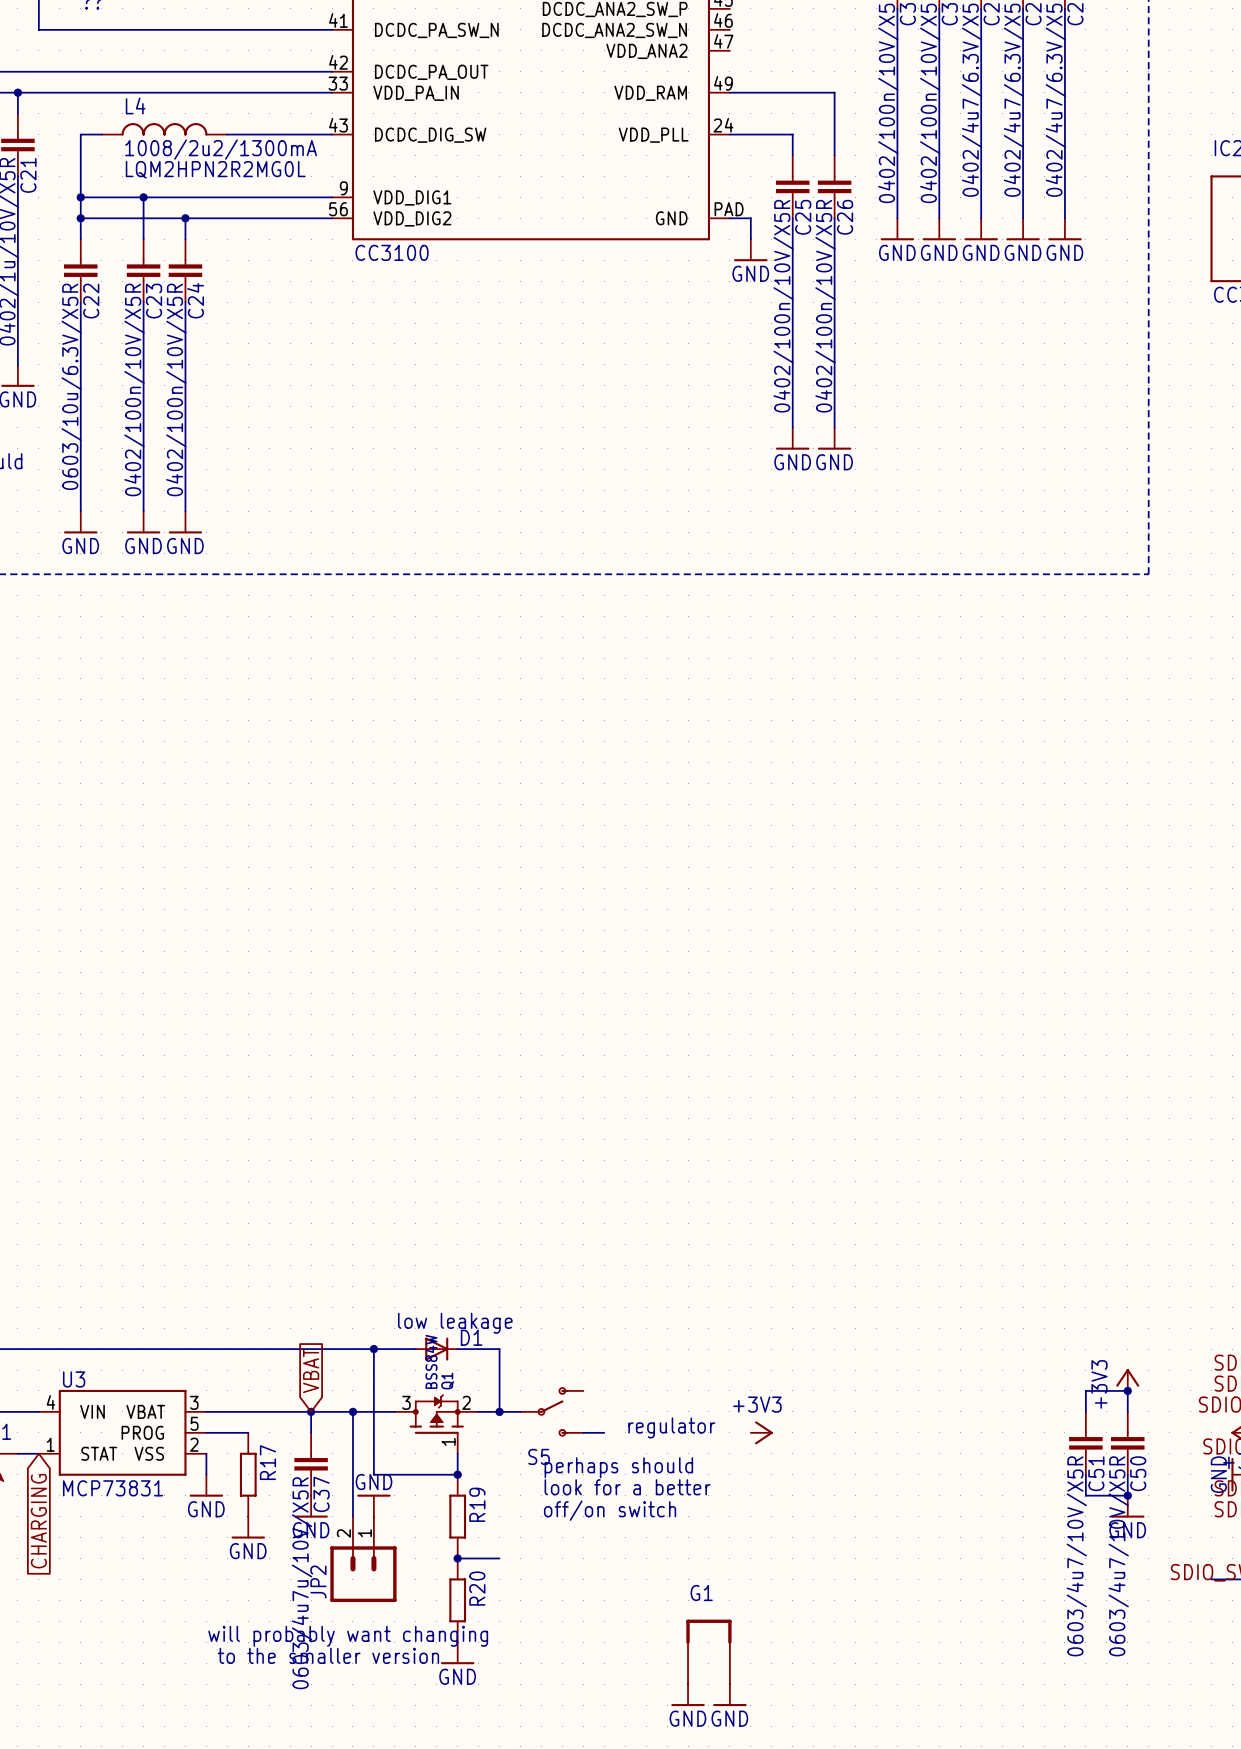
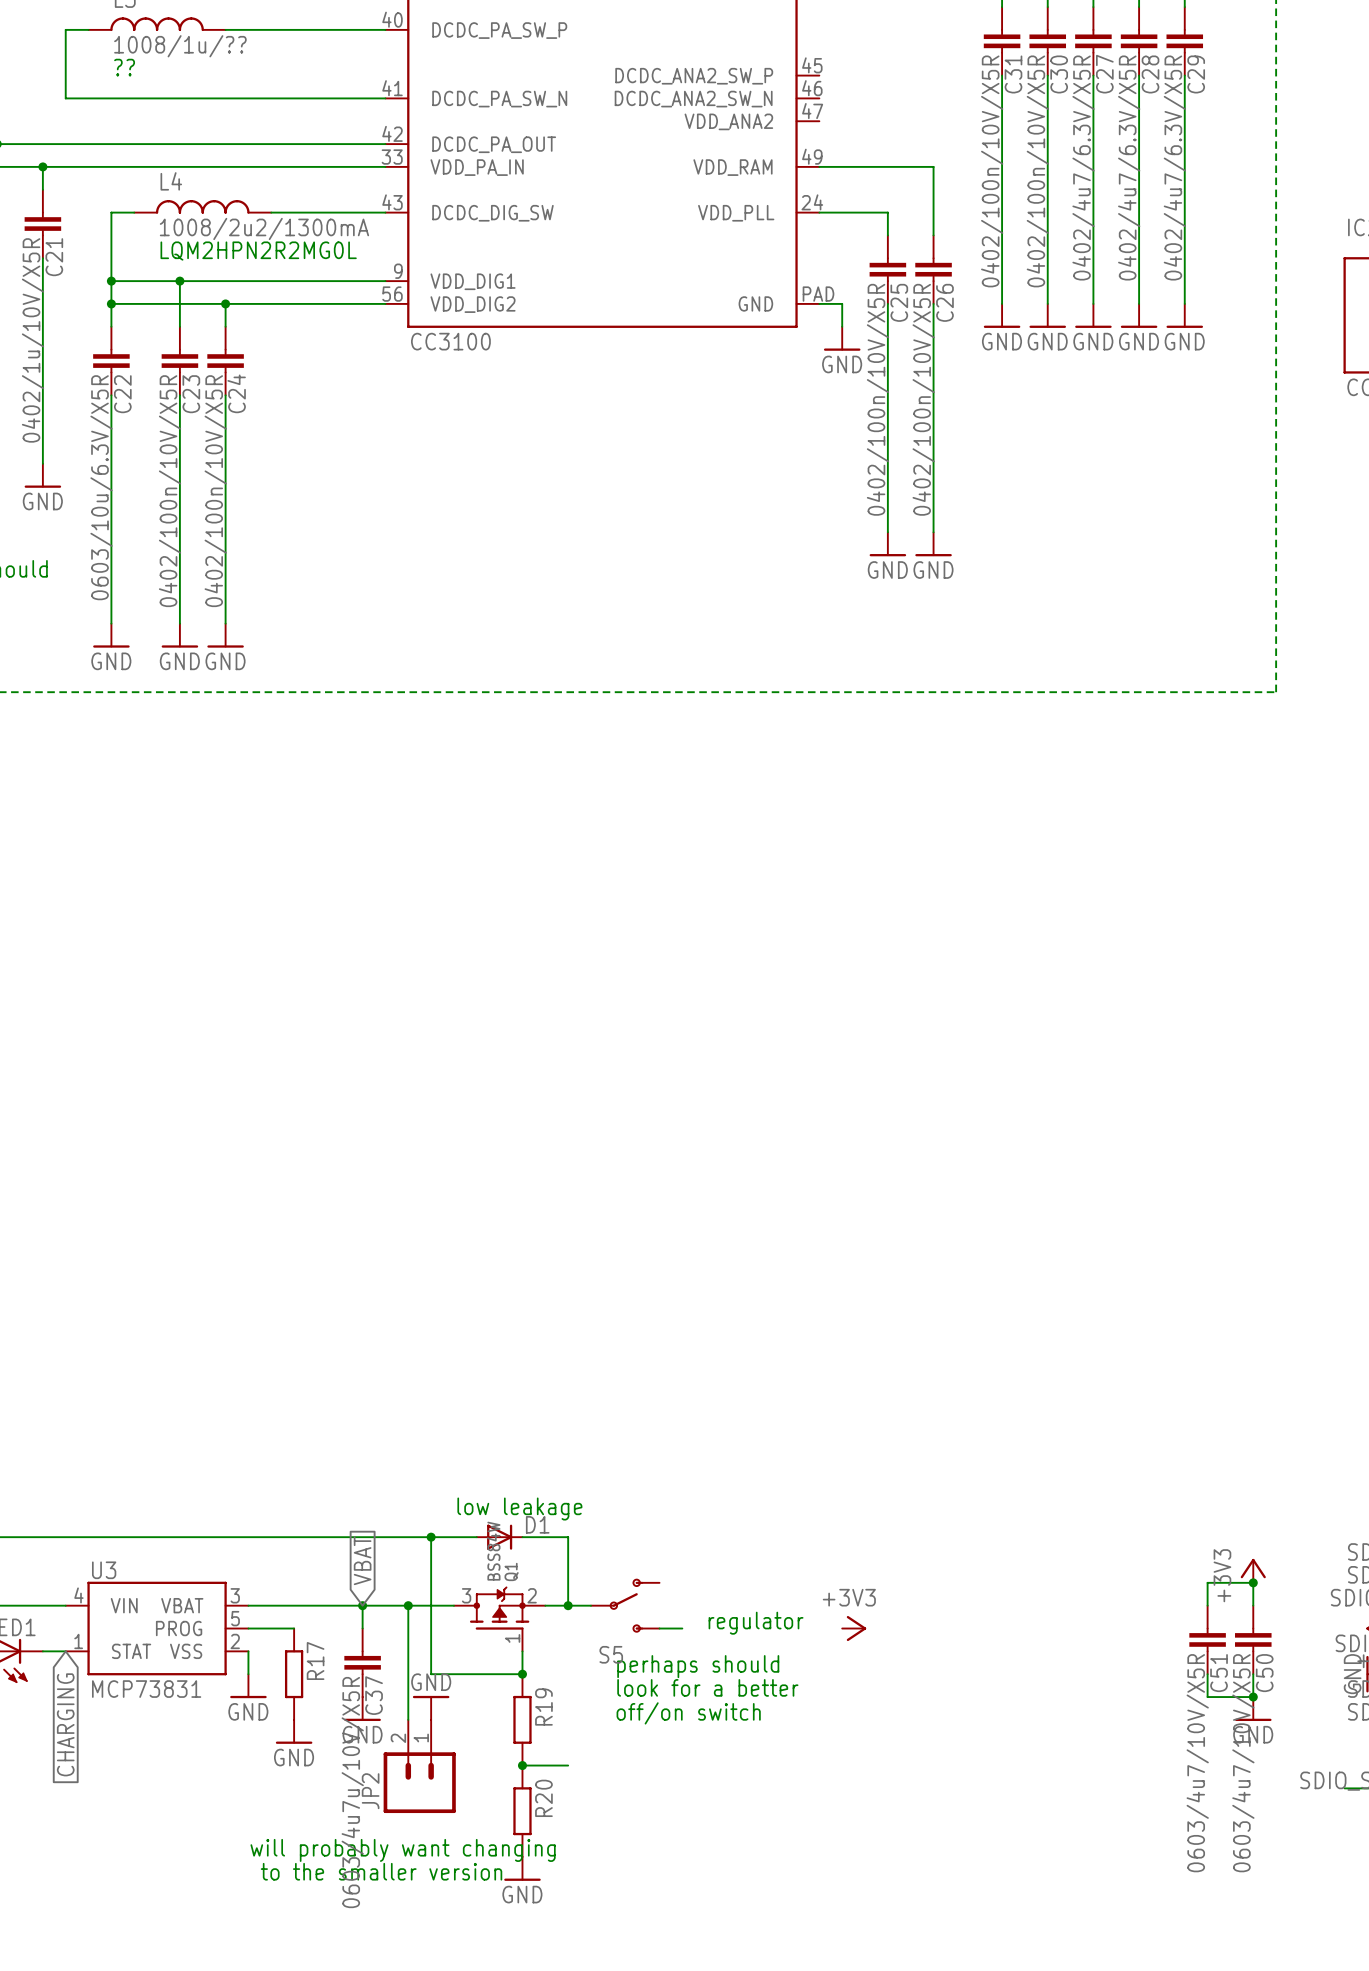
G1: (708, 1651) -> none
power symbol: GND (688, 1695) -> none
power symbol: GND (729, 1695) -> none

